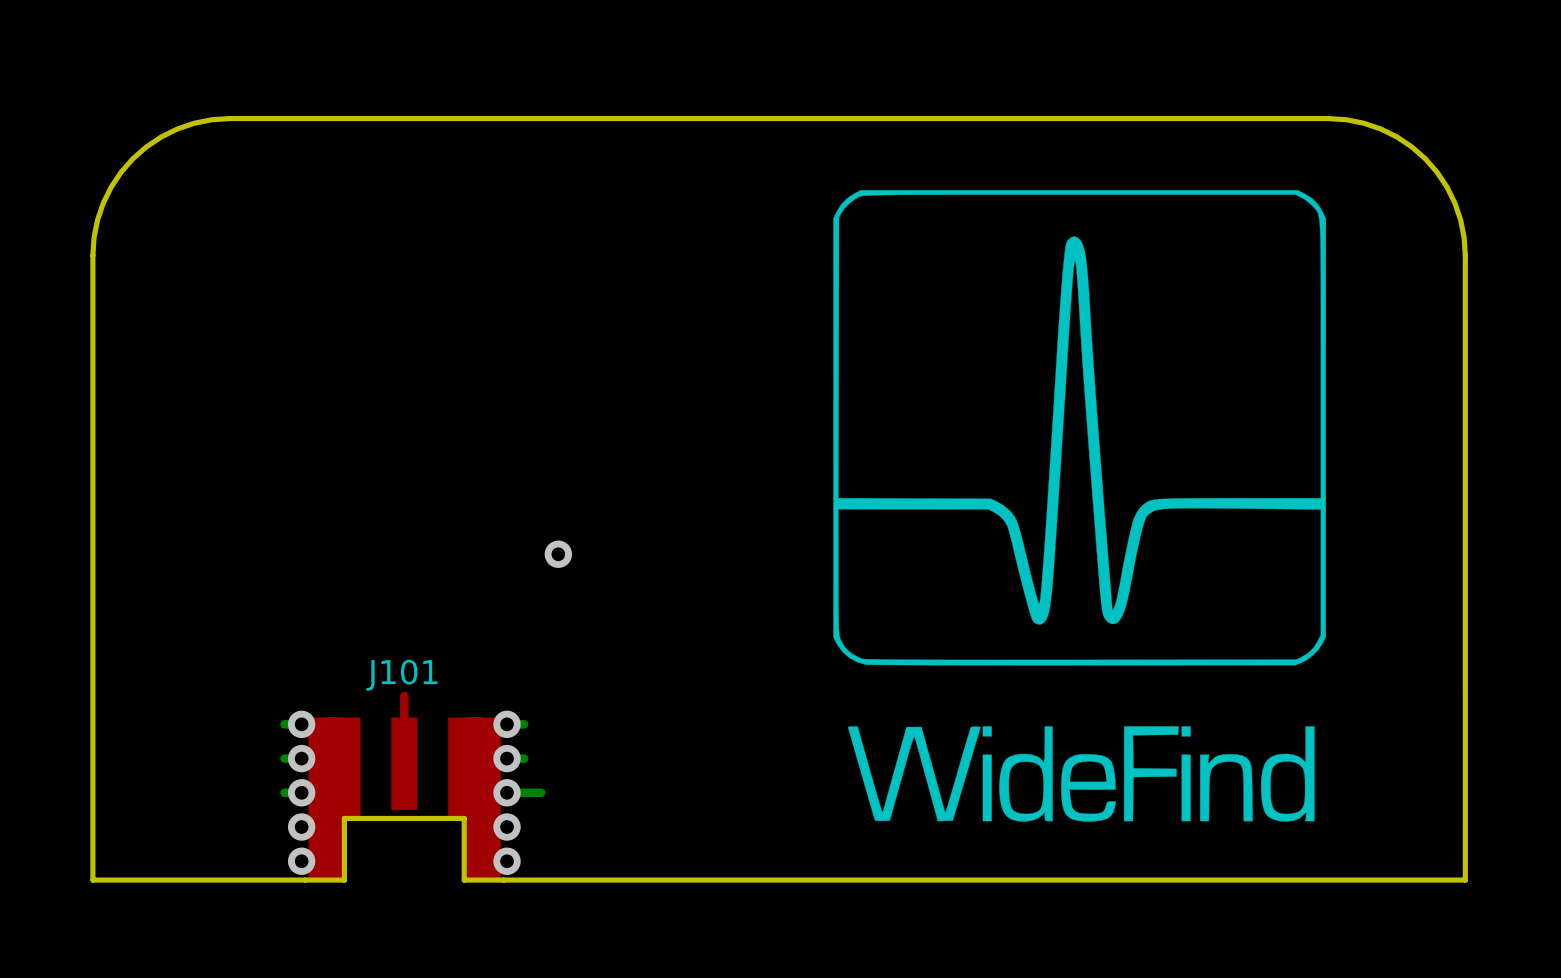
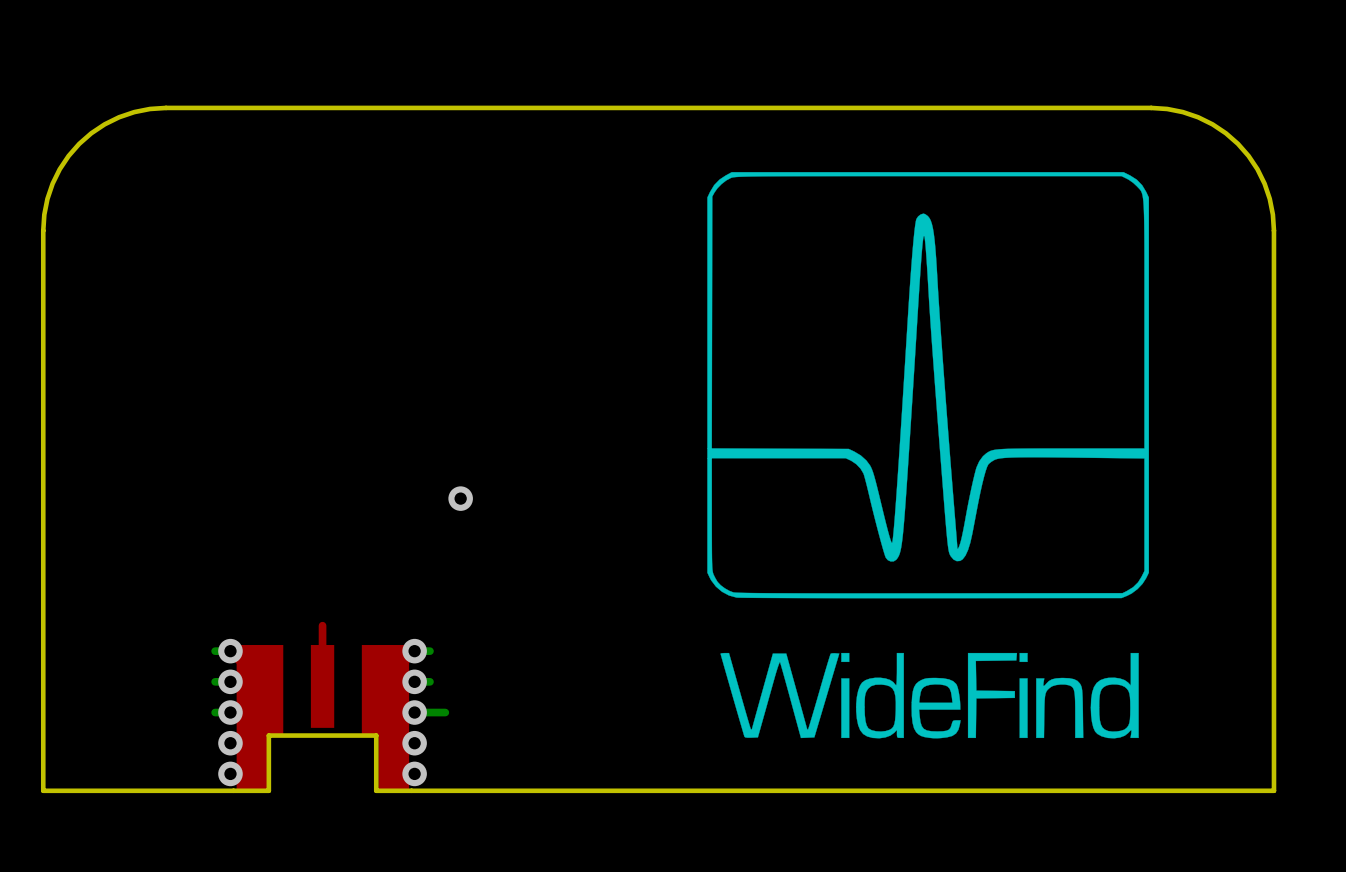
J101 name: J101 (401, 675) -> none

